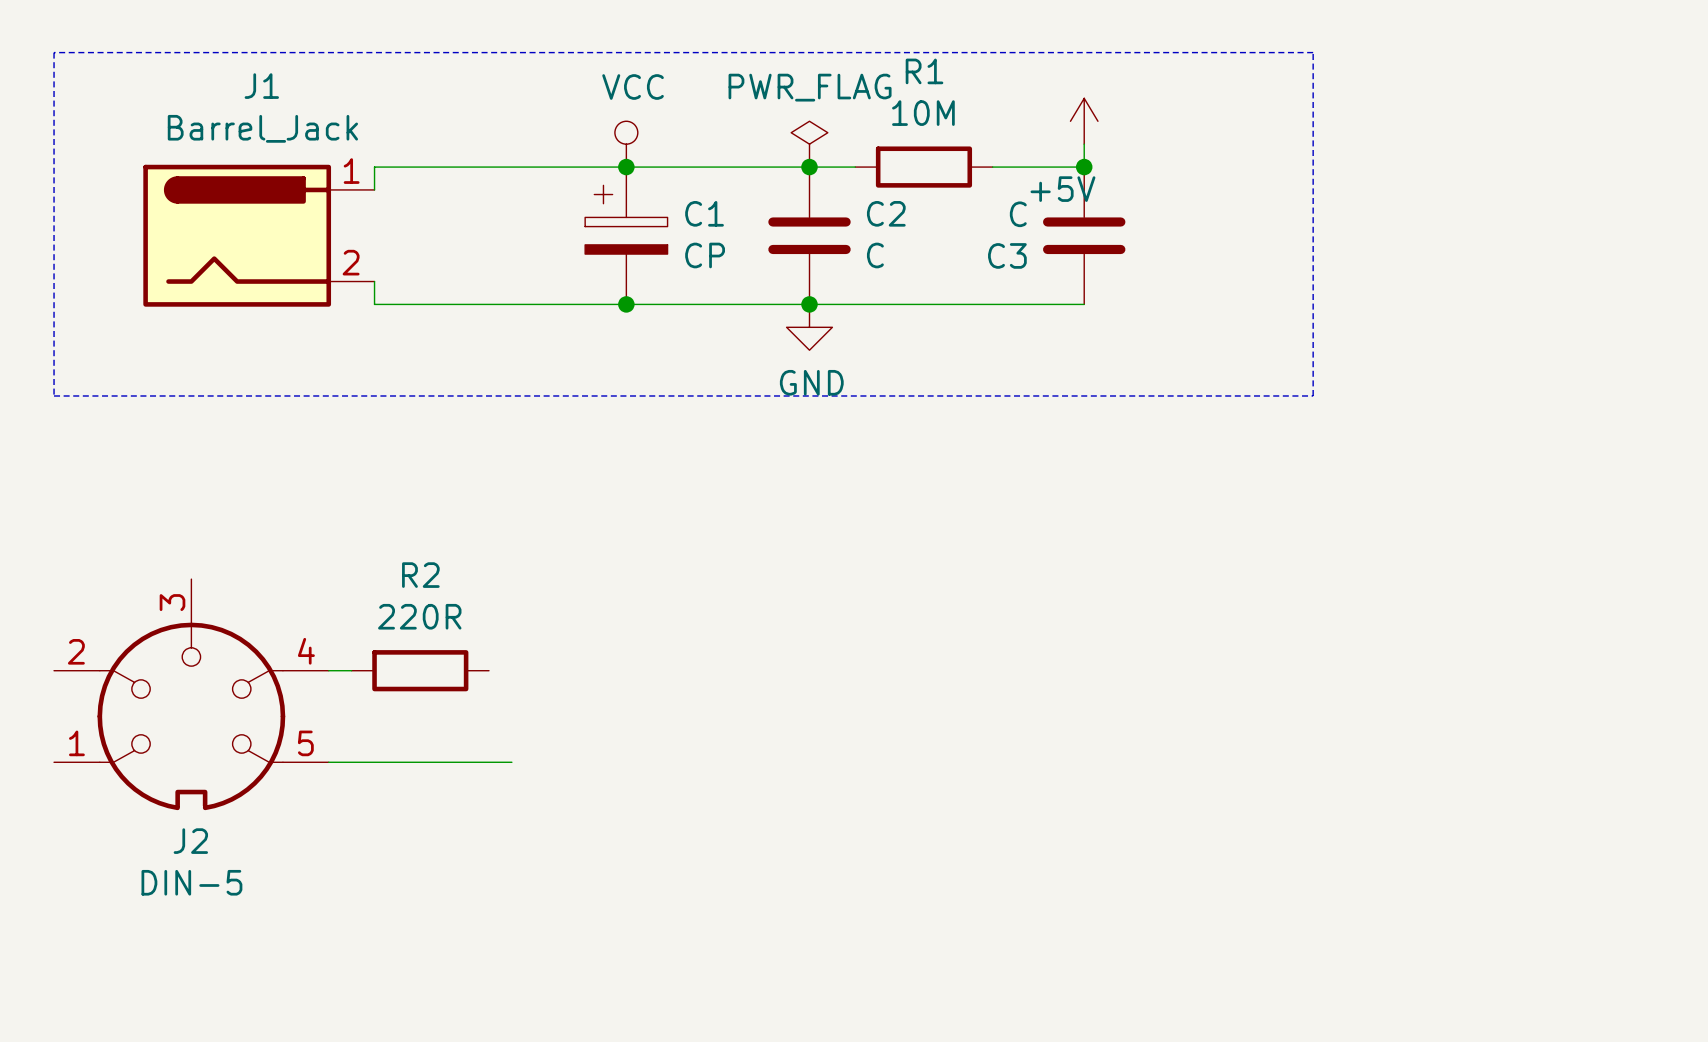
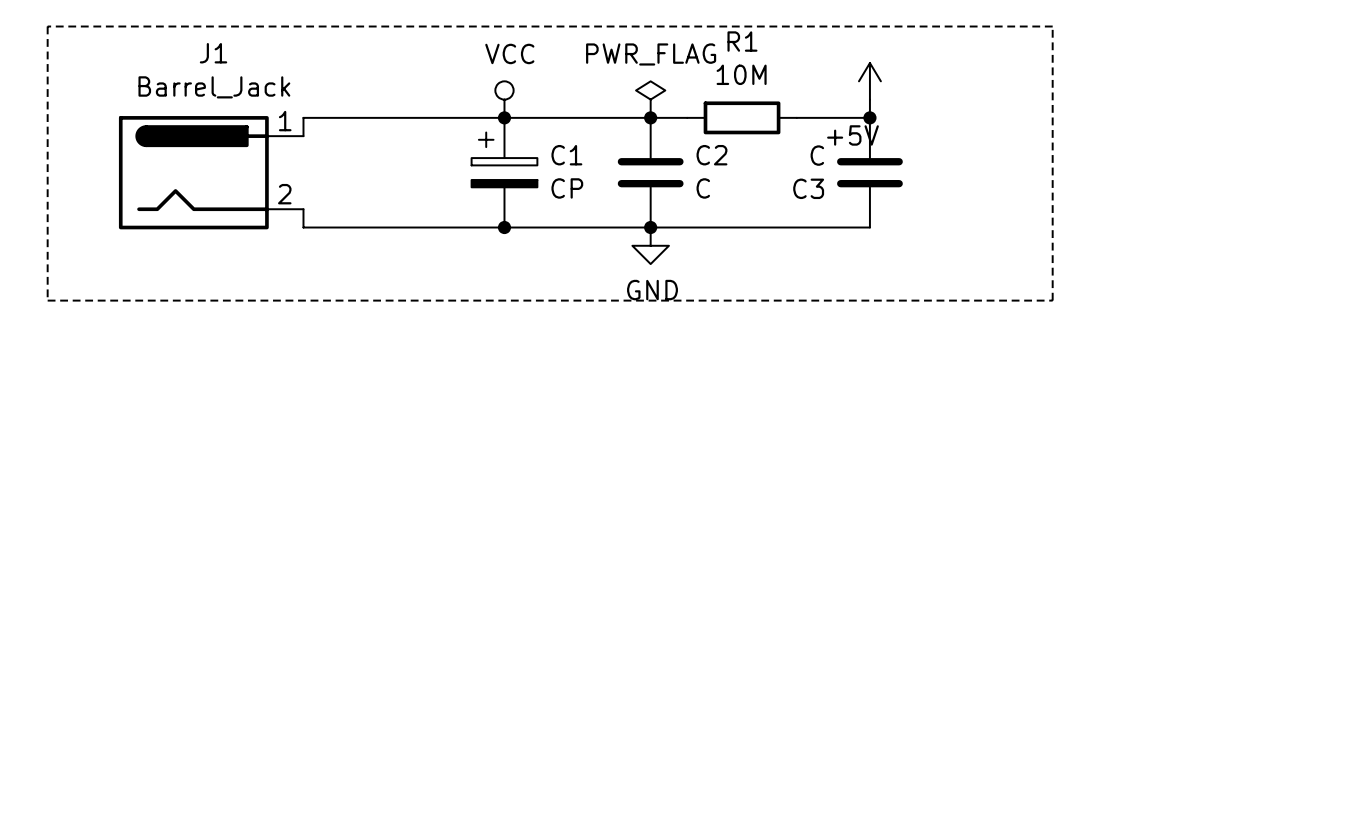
wire: (328, 670) (351, 670) -> none
R2: 220R (420, 670) -> none
J2: DIN-5 (191, 694) -> none
wire: (328, 762) (511, 762) -> none

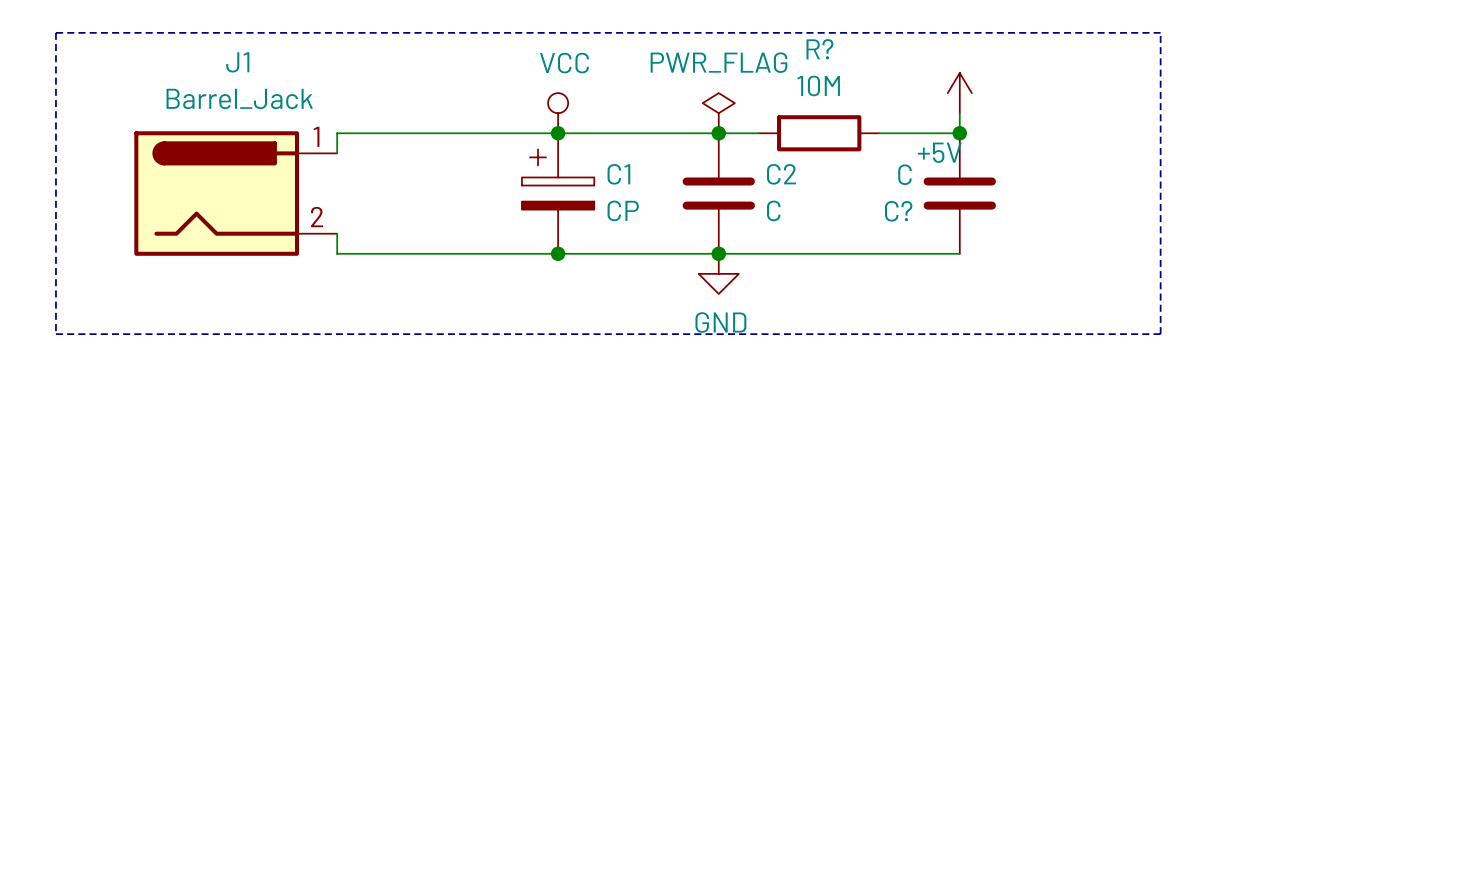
R1 name: R1 (742, 41) -> R? (819, 49)
C3 name: C3 (808, 188) -> C? (898, 211)

